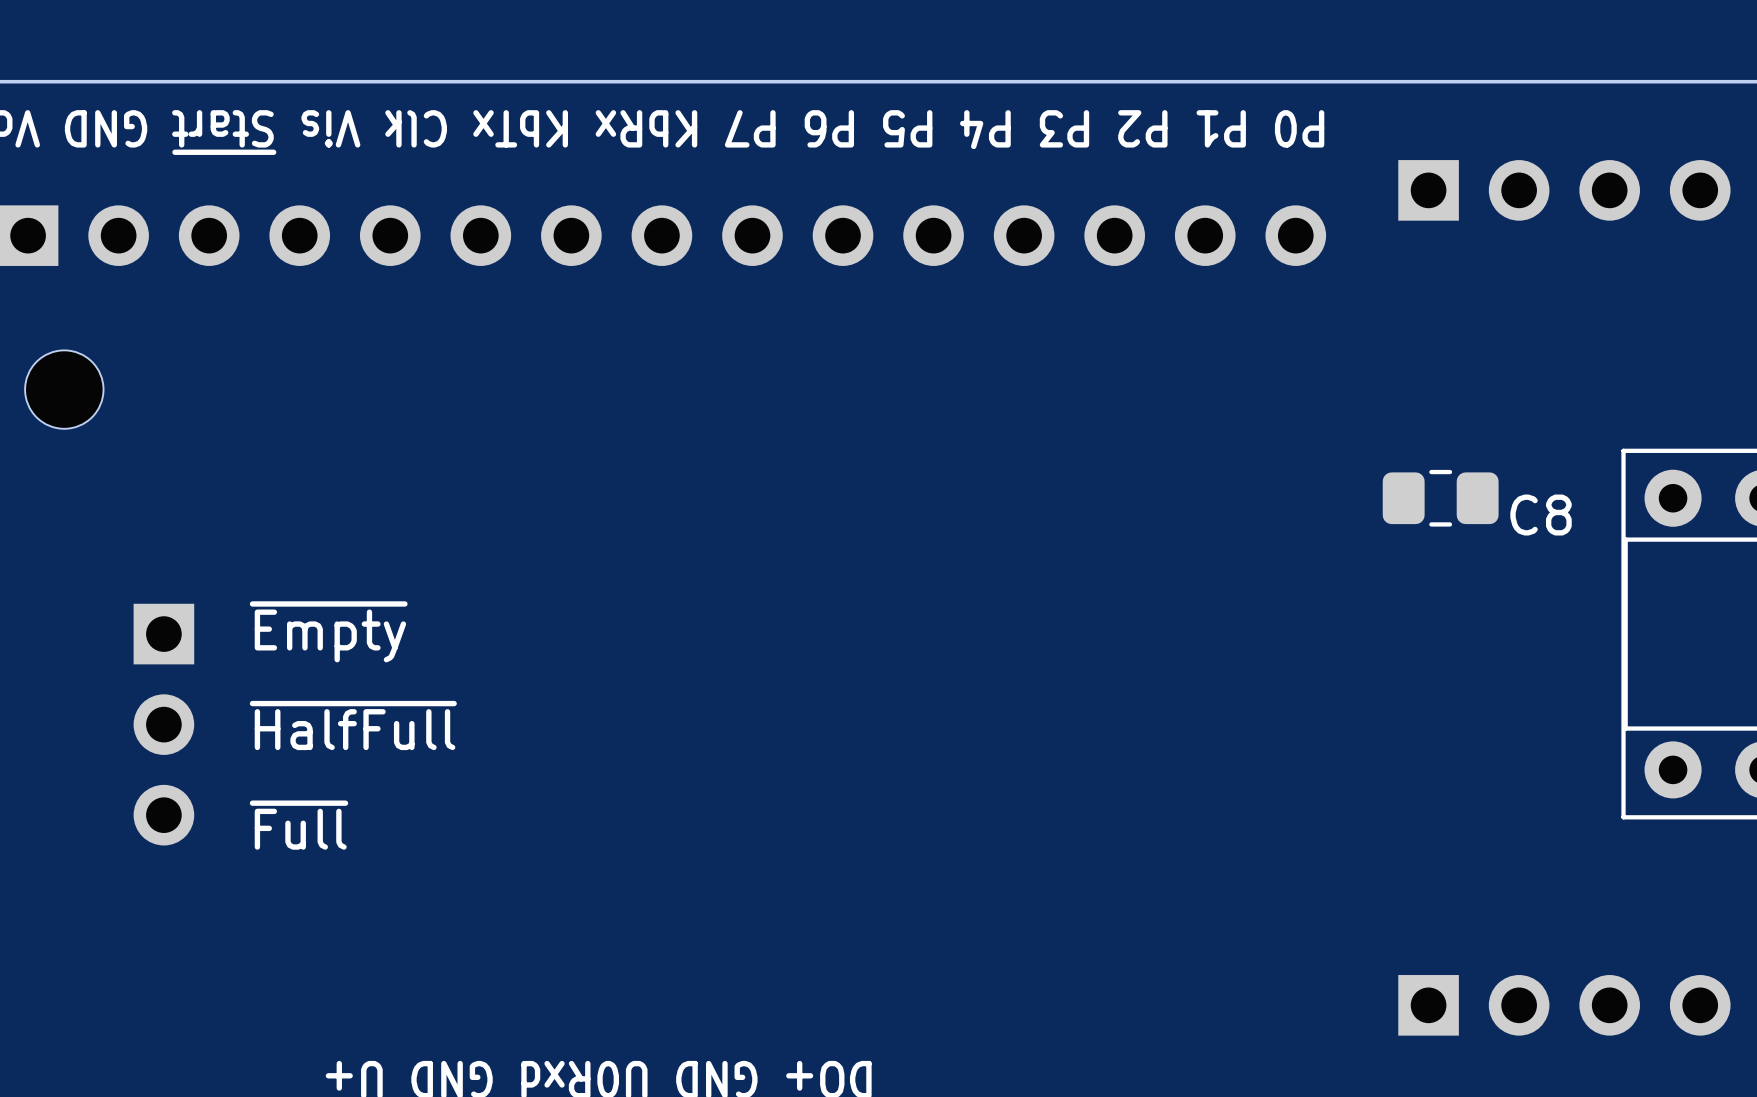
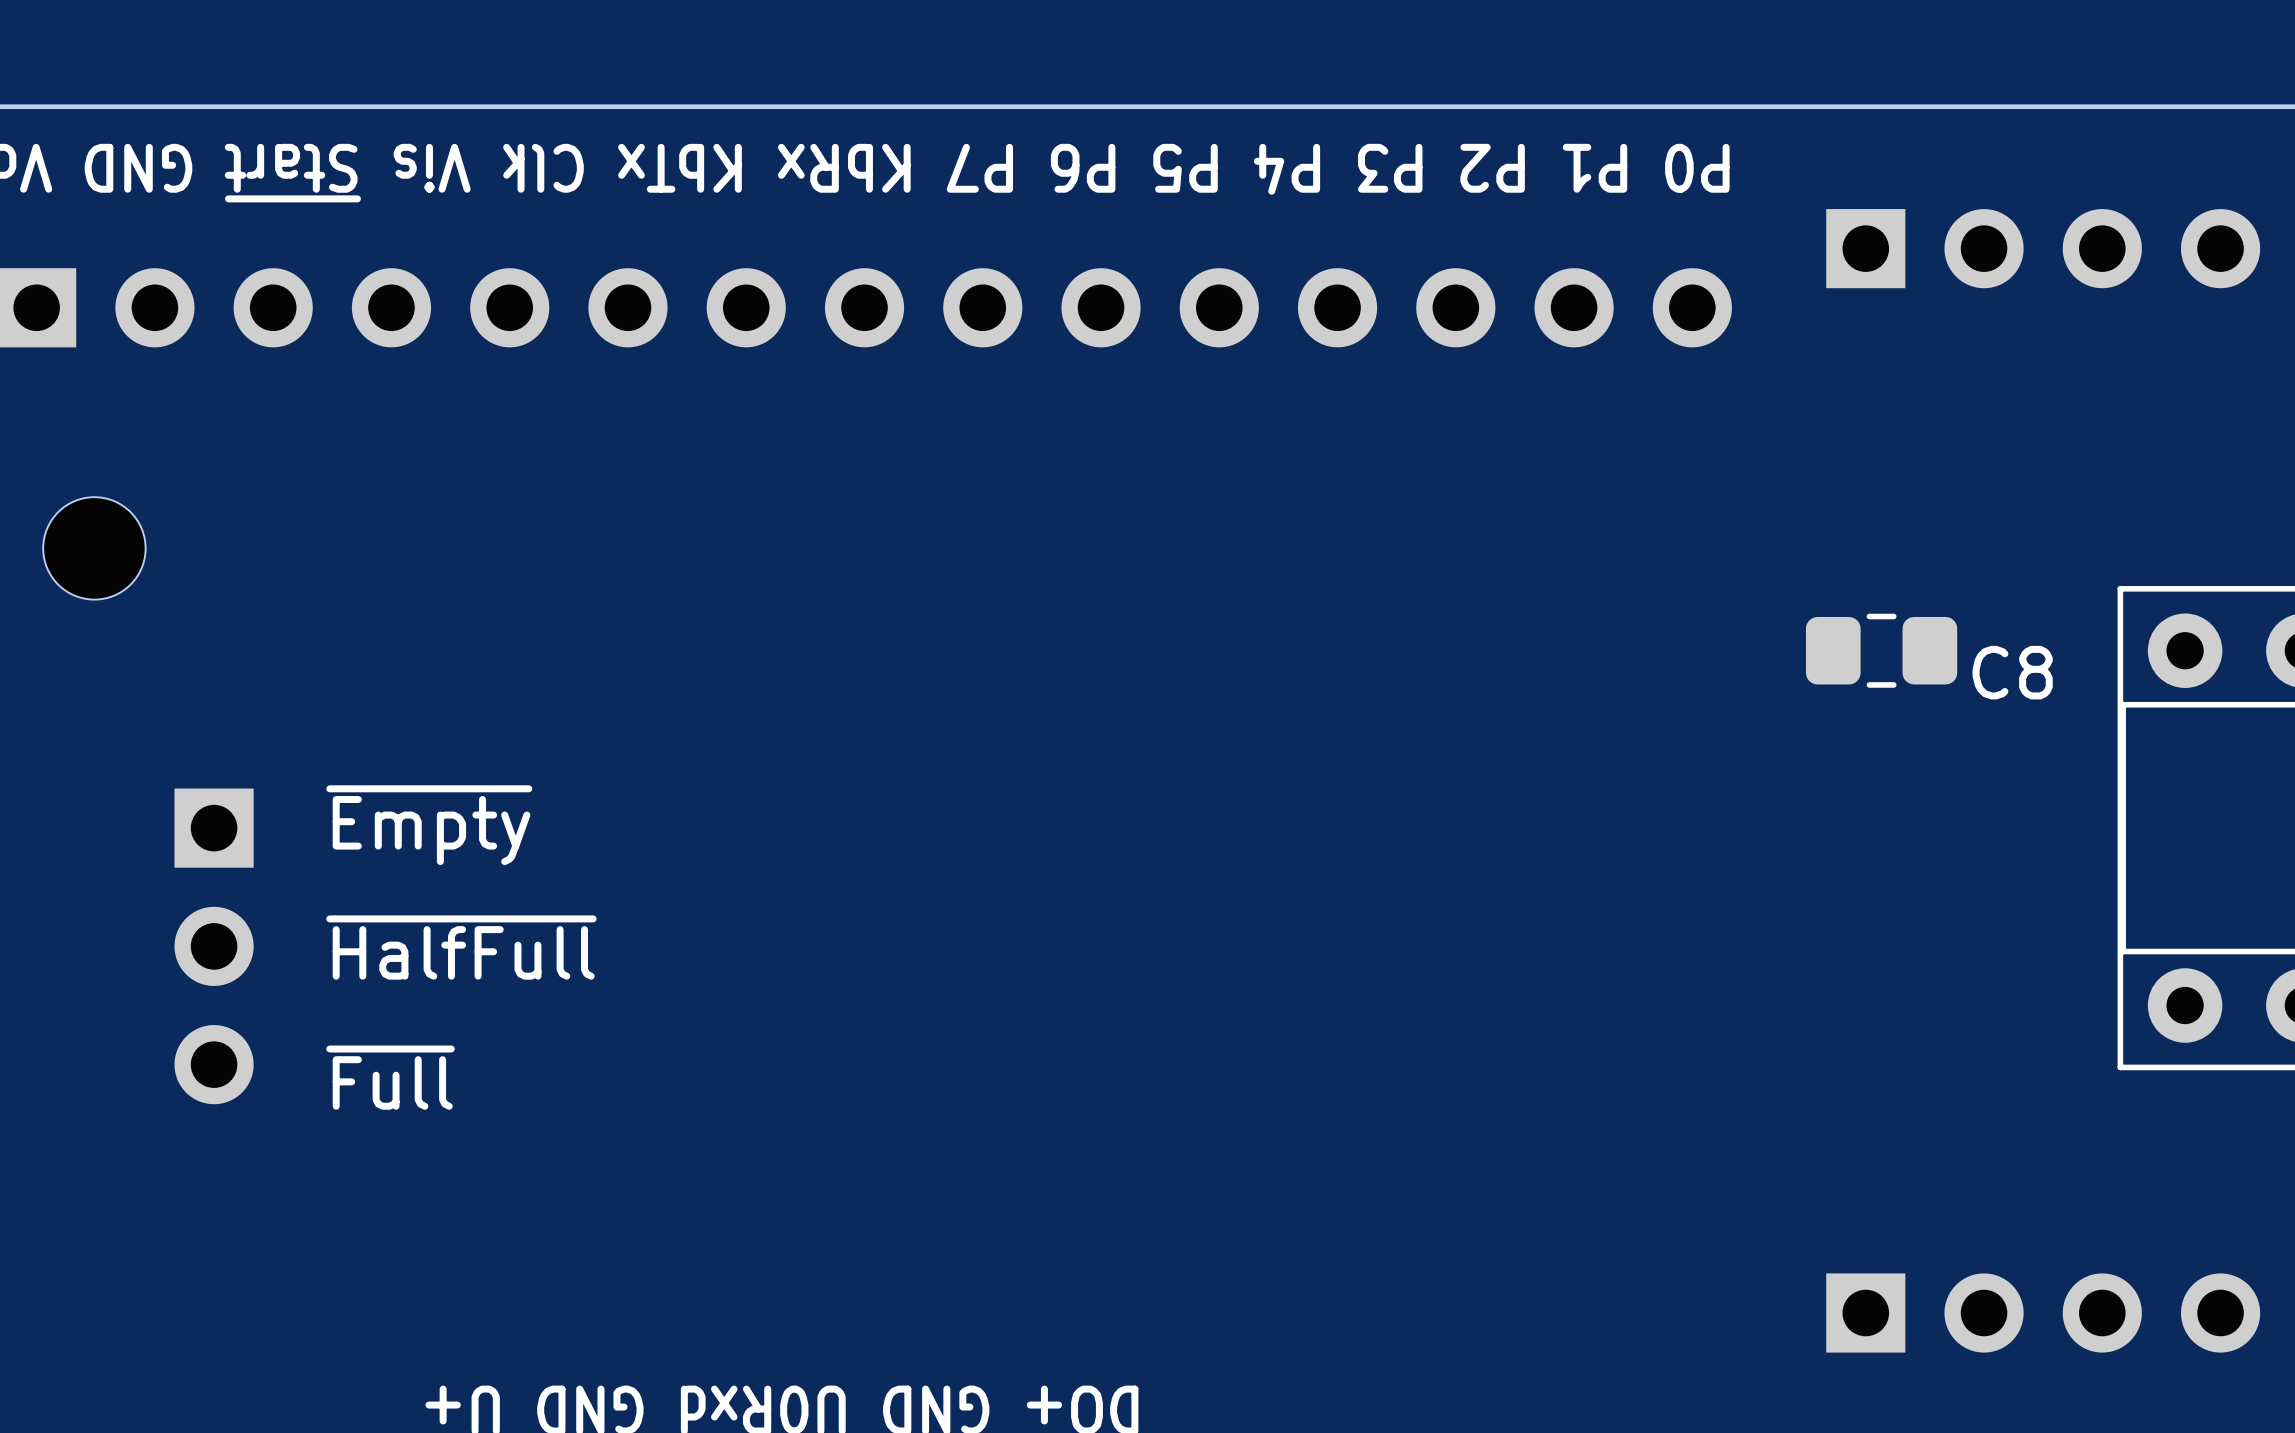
part position: (64, 389) -> (94, 548)

